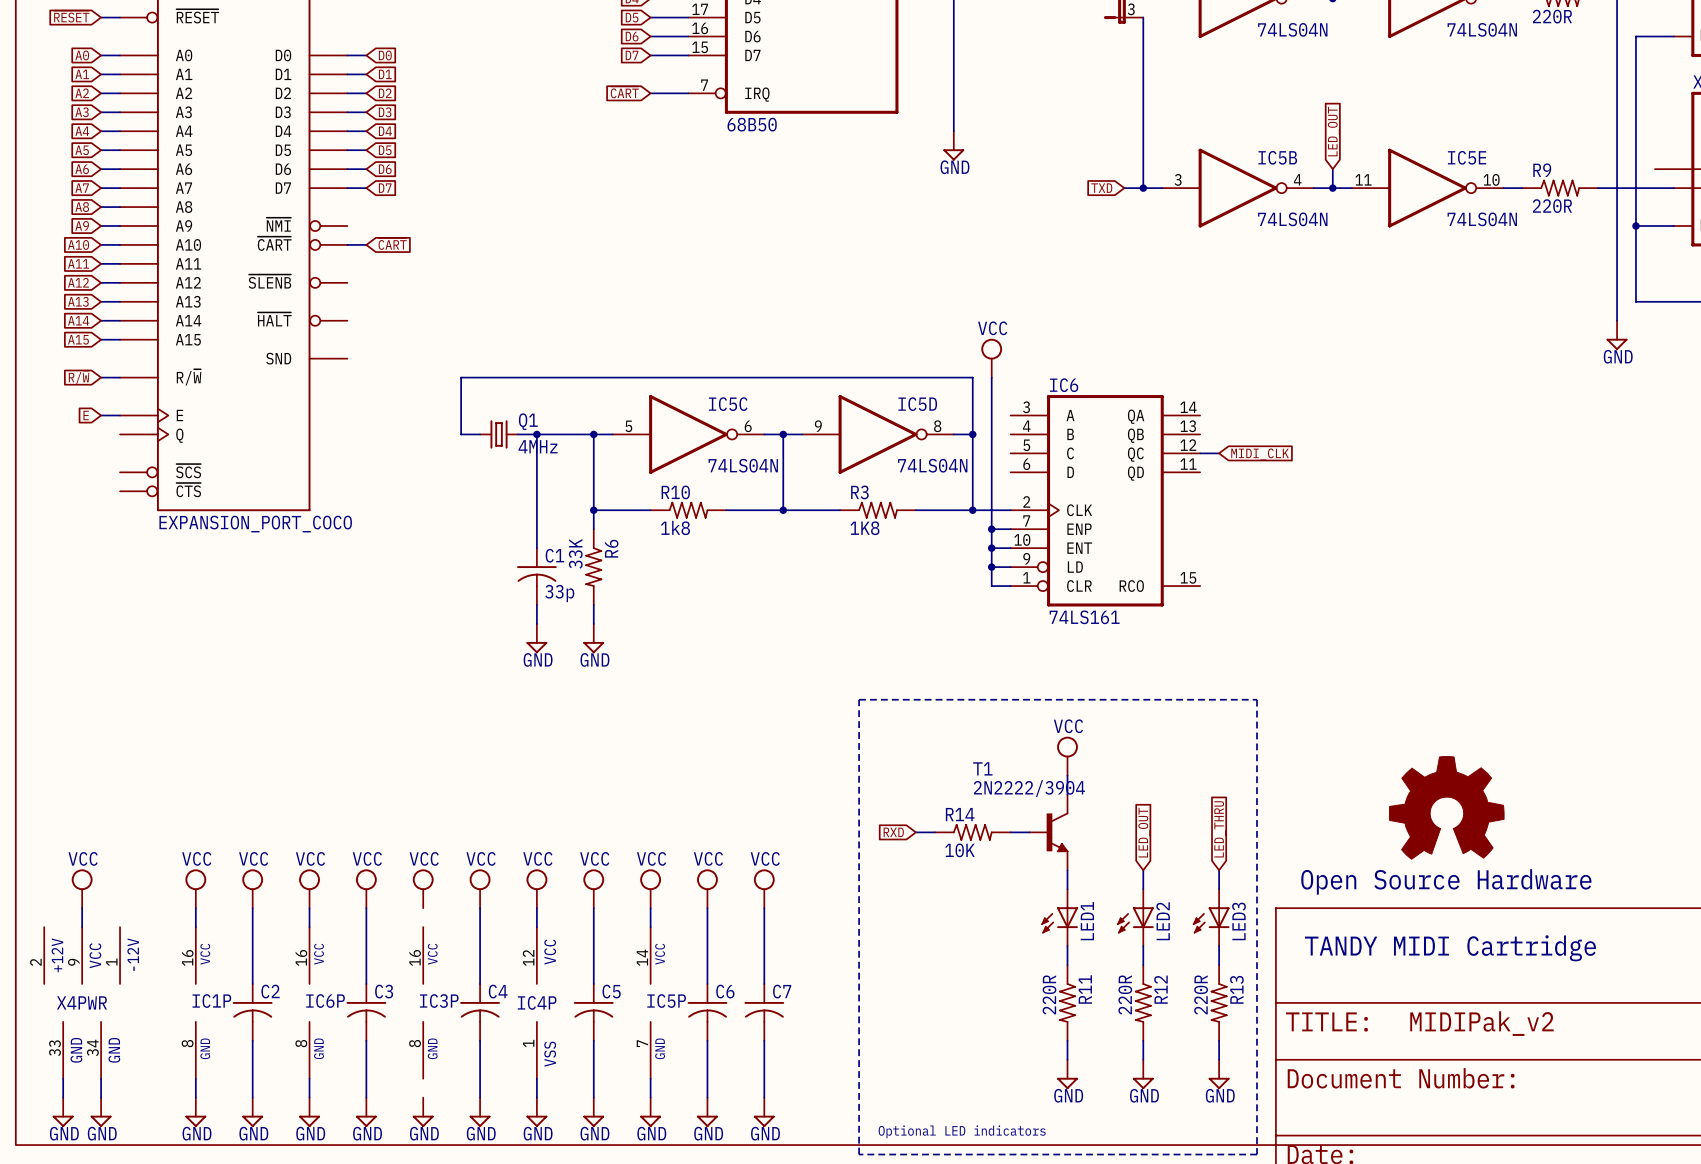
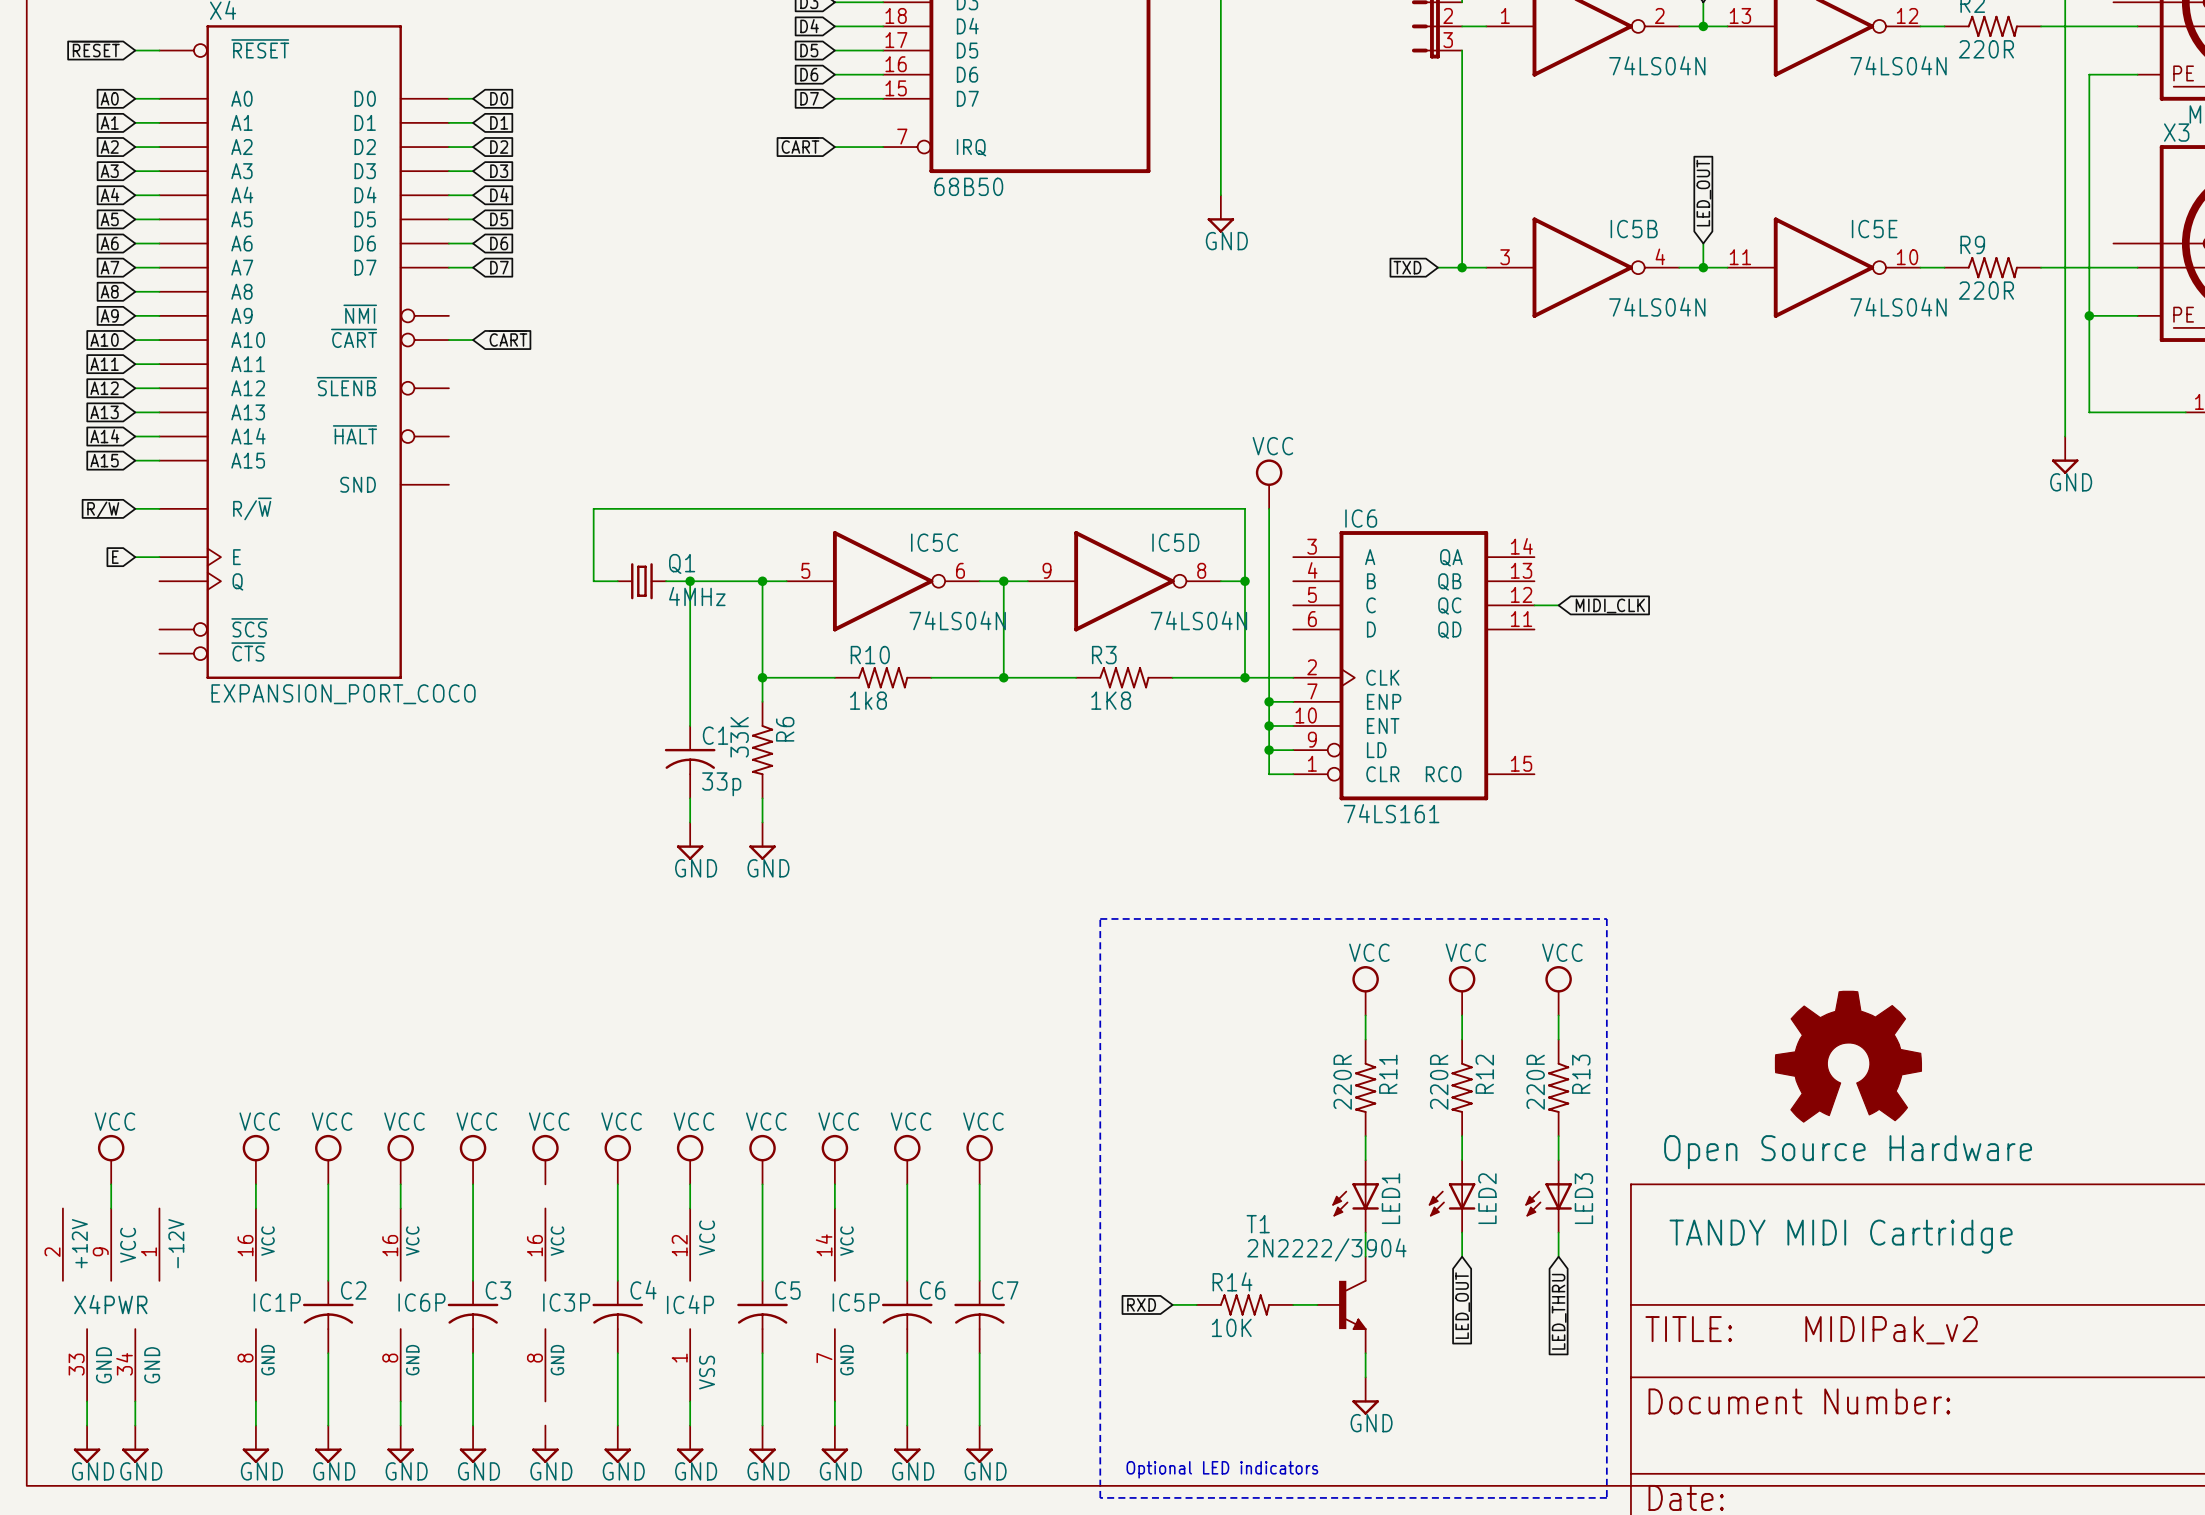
power symbol: none -> VCC (1462, 990)
power symbol: none -> VCC (1558, 990)
wire: none -> (1462, 1015) (1462, 1039)
wire: none -> (1558, 1015) (1558, 1039)
global label rotation: 0° (1220, 829) -> 180° (1559, 1311)
global label position: LED_THRU (1220, 829) -> LED_THRU (1559, 1311)
global label position: RXD (893, 832) -> RXD (1141, 1304)
wire: (915, 832) (934, 832) -> (1172, 1304) (1196, 1304)
R14 position: (972, 832) -> (1245, 1304)
wire: (1010, 832) (1029, 832) -> (1293, 1304) (1317, 1304)
T1 position: (1048, 832) -> (1341, 1304)
global label rotation: 0° (1144, 832) -> 180° (1462, 1305)
global label position: LED_OUT (1144, 832) -> LED_OUT (1462, 1305)
R11 position: (1067, 1002) -> (1365, 1087)
R12 position: (1143, 1002) -> (1462, 1087)
R13 position: (1219, 1002) -> (1558, 1087)
wire: (1143, 1040) (1143, 1059) -> none
wire: (1219, 1040) (1219, 1059) -> none
power symbol: GND (1143, 1074) -> none
power symbol: GND (1219, 1074) -> none

